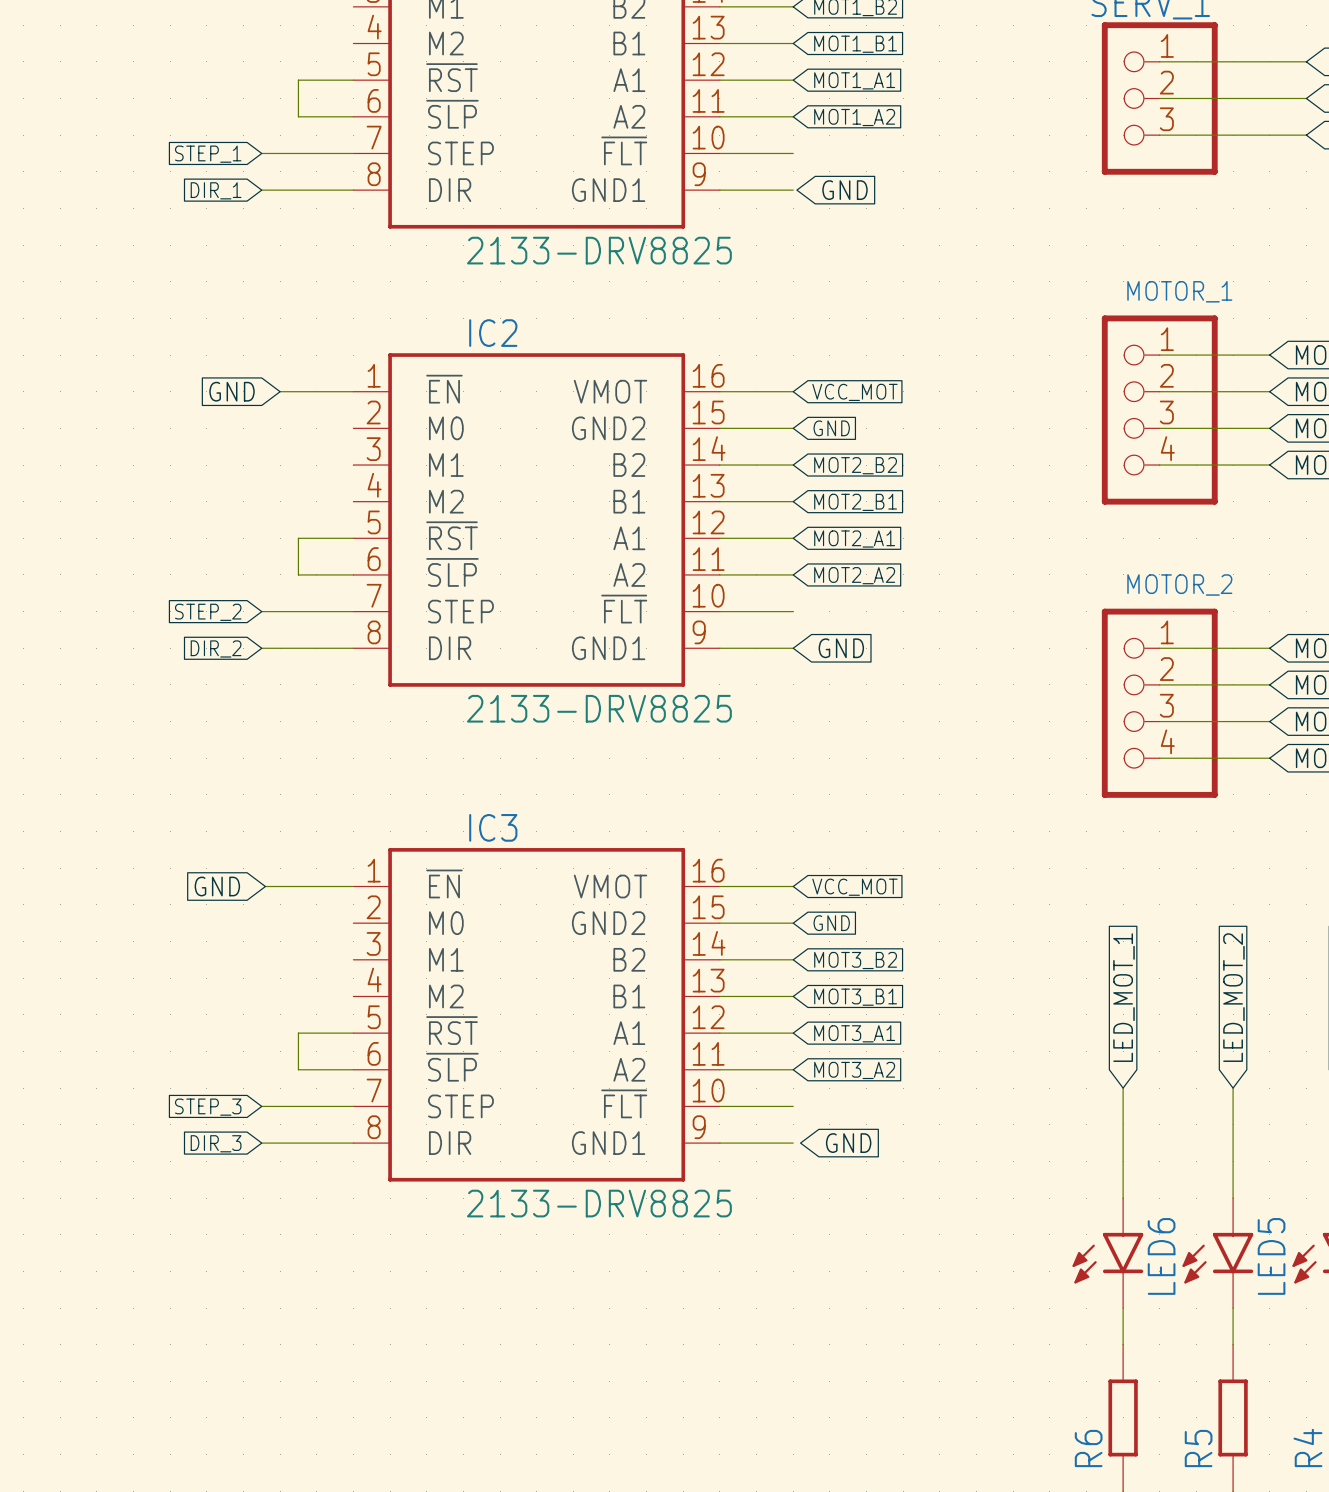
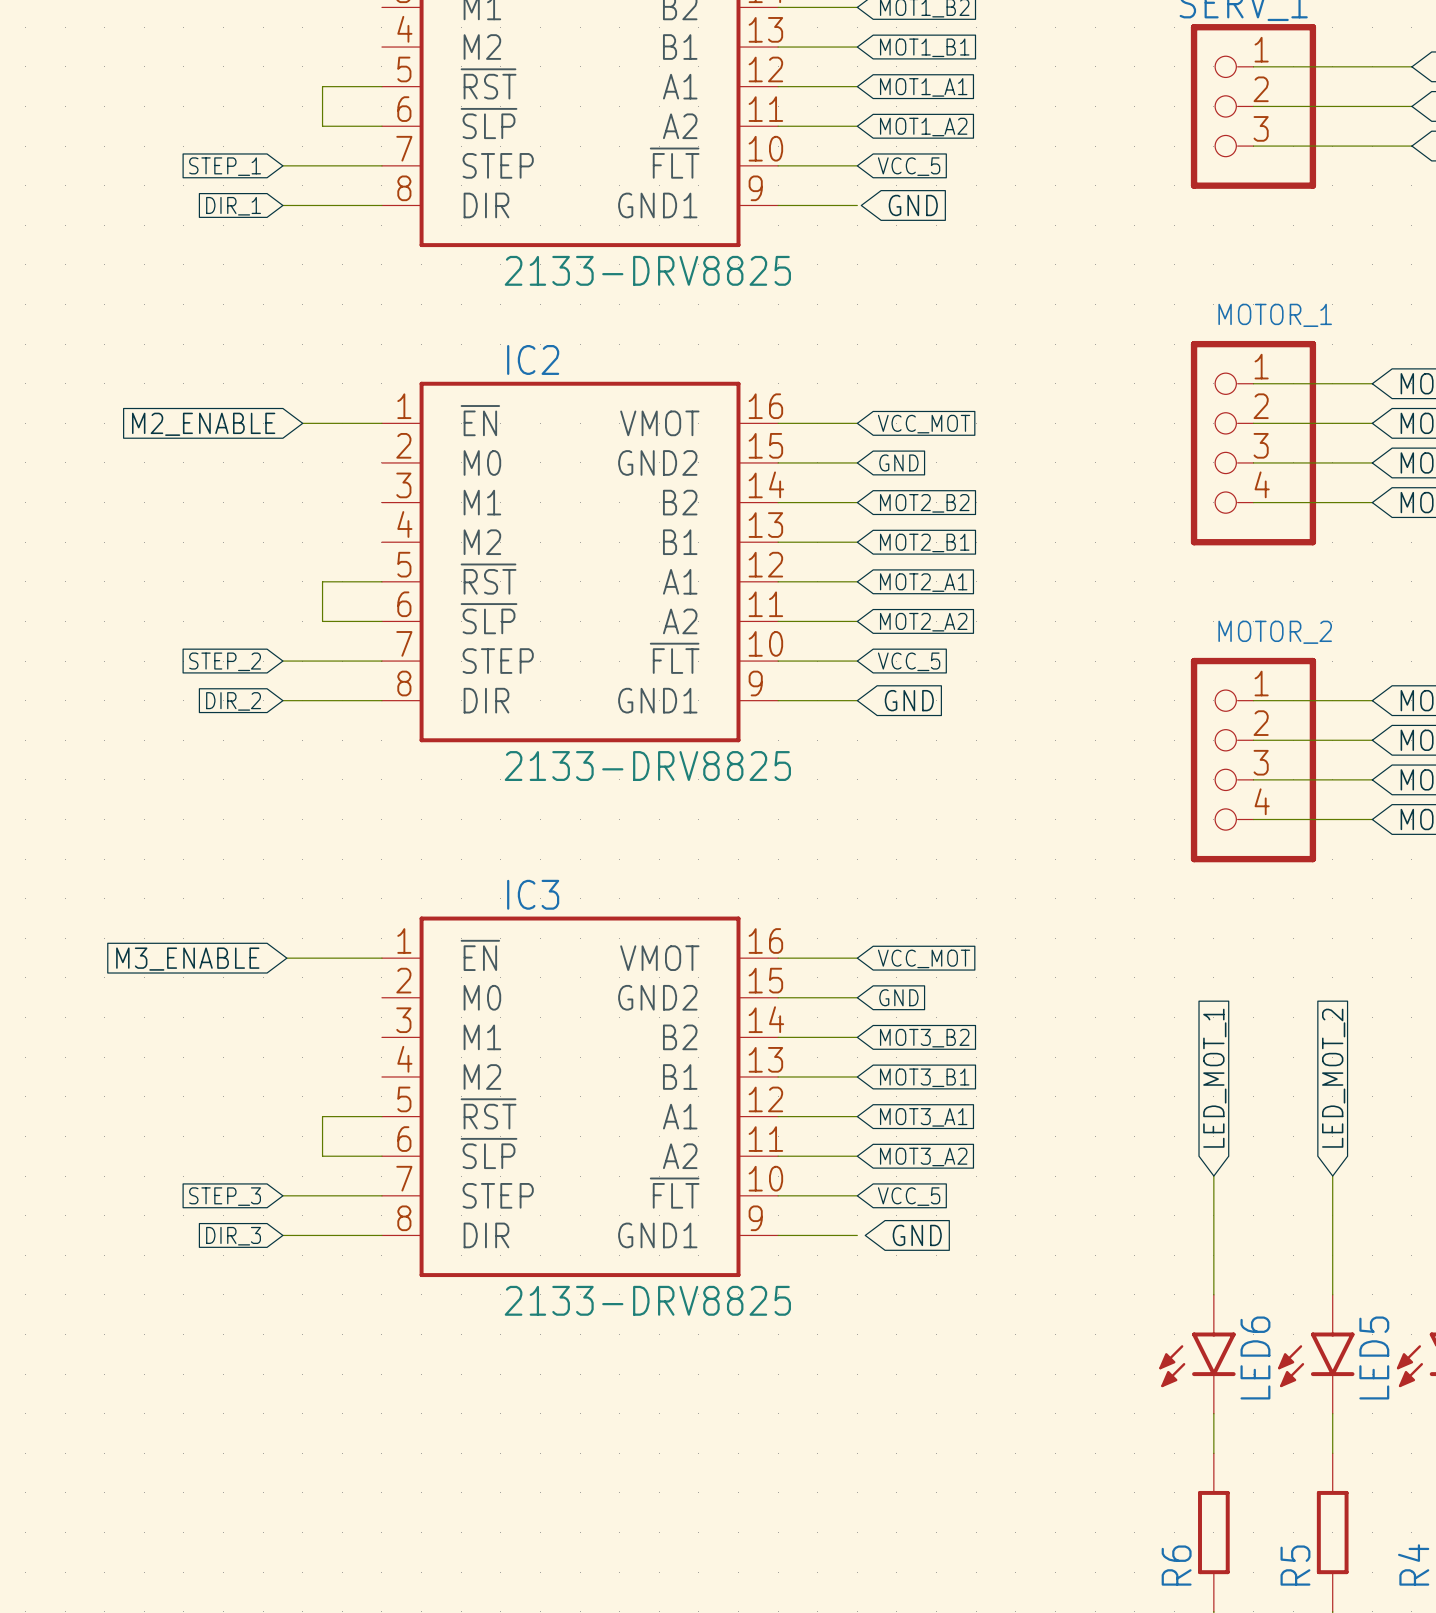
global label: none -> VCC_5 (909, 166)
global label: GND (232, 391) -> M2_ENABLE (203, 424)
global label: none -> VCC_5 (909, 661)
global label: GND (217, 886) -> M3_ENABLE (187, 959)
global label: none -> VCC_5 (909, 1196)

